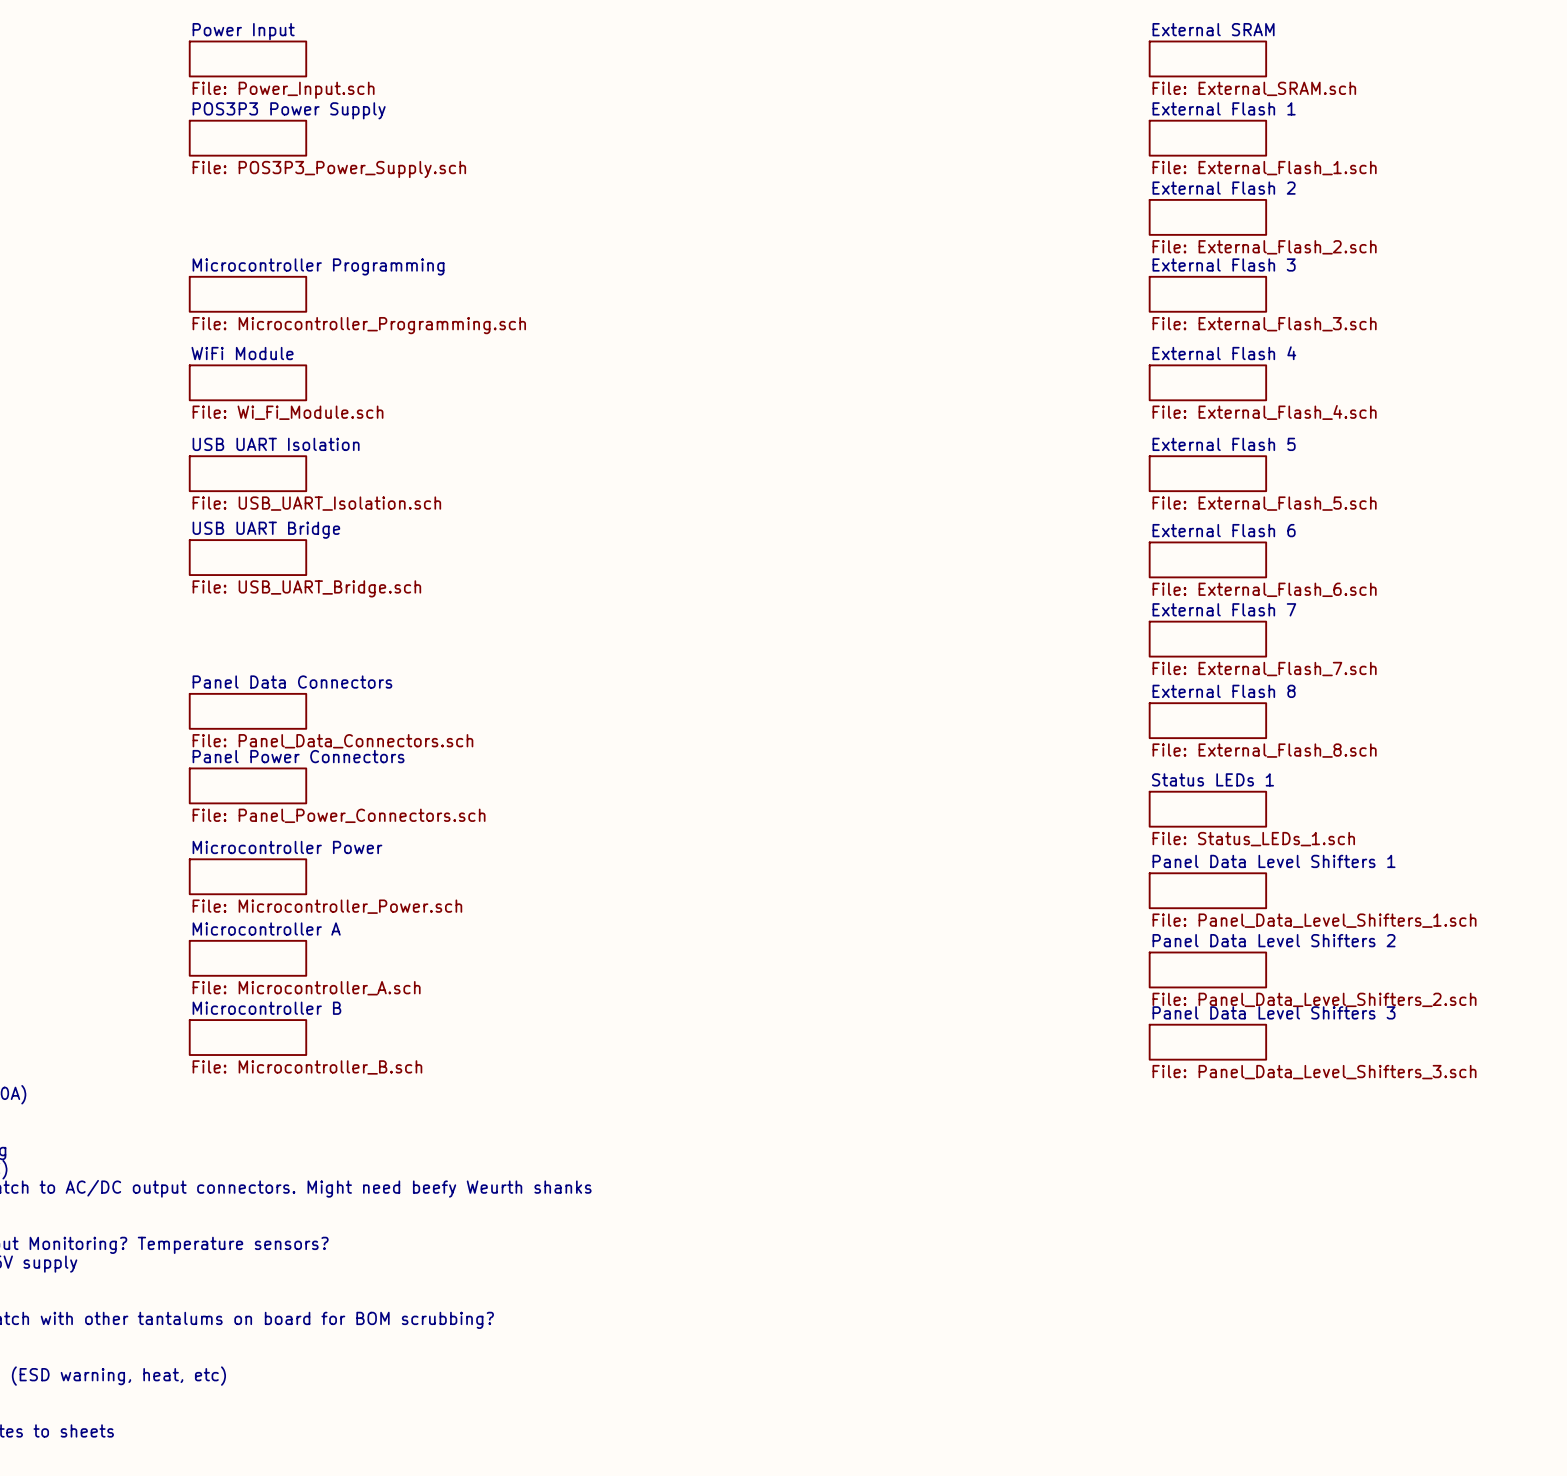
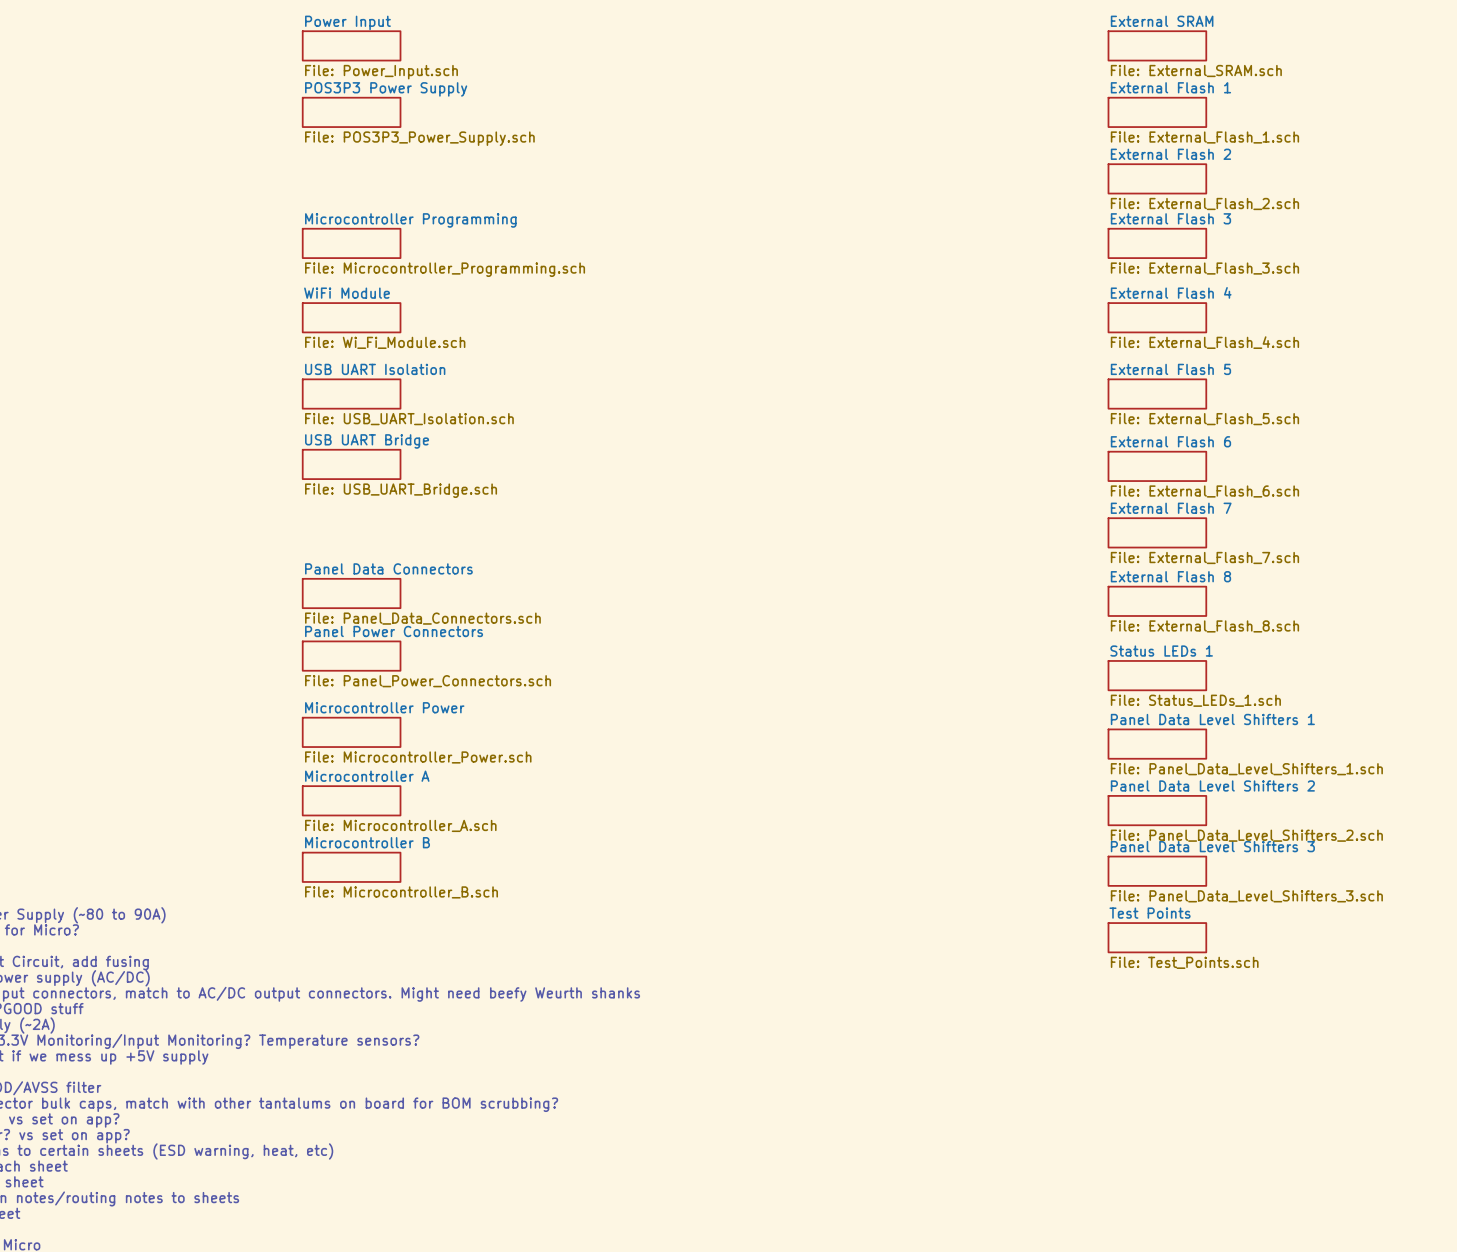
sheet Test Points: none -> File: Test_Points.sch (1157, 937)

